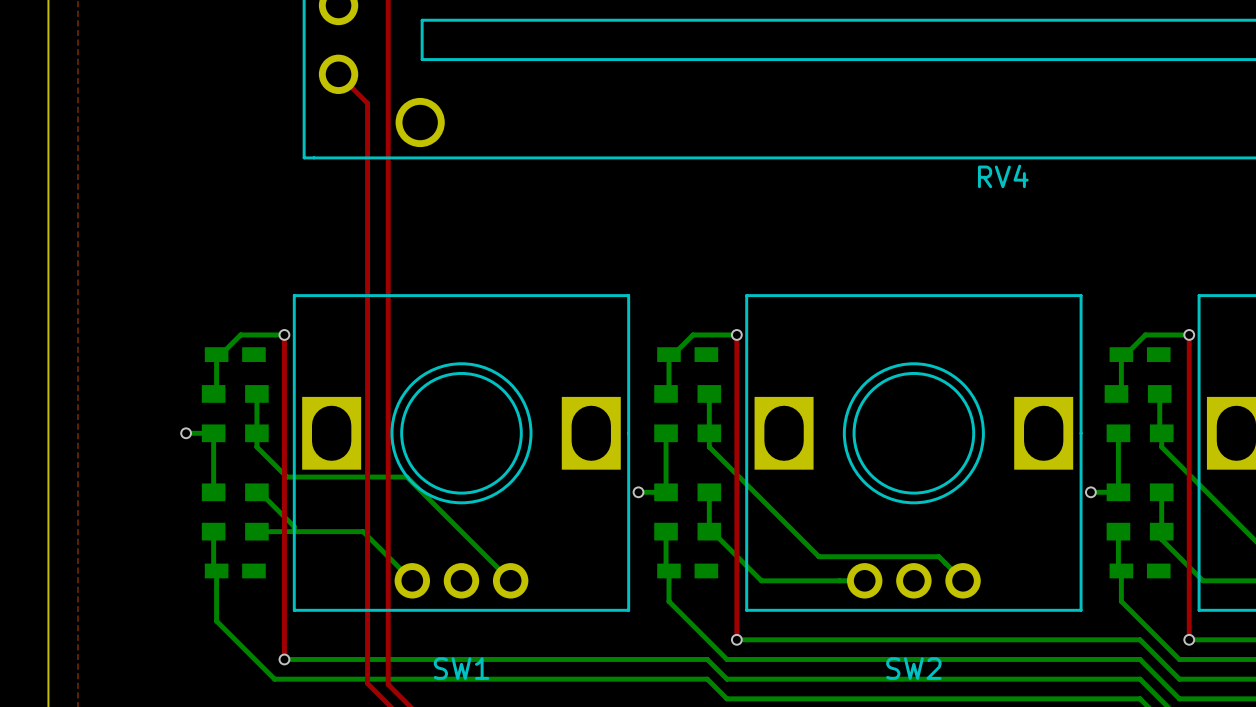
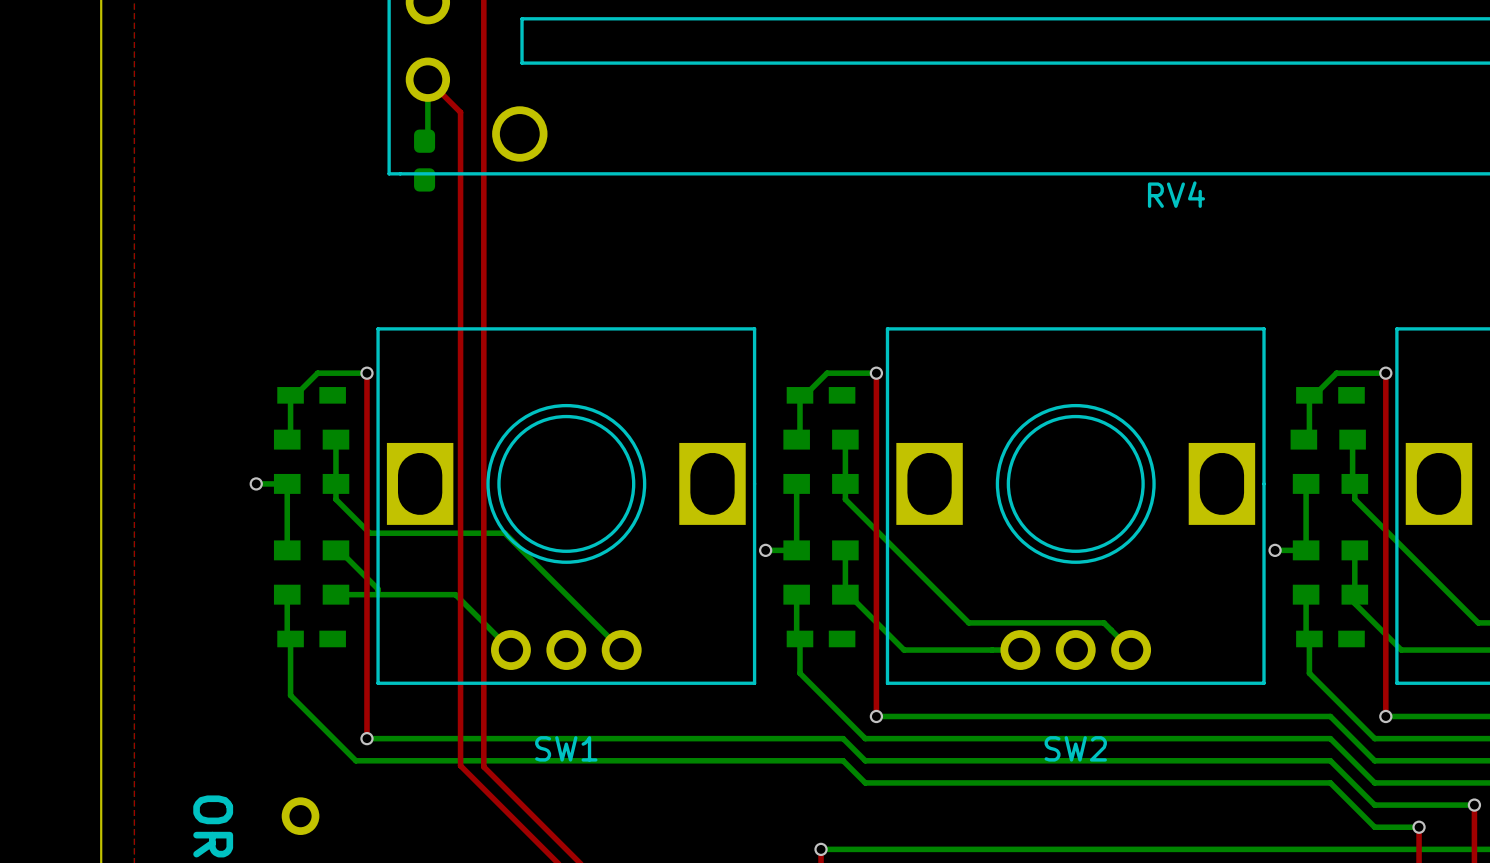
bottom track: none -> (427, 79) (427, 137) (424, 141)
part: none -> (424, 160)

